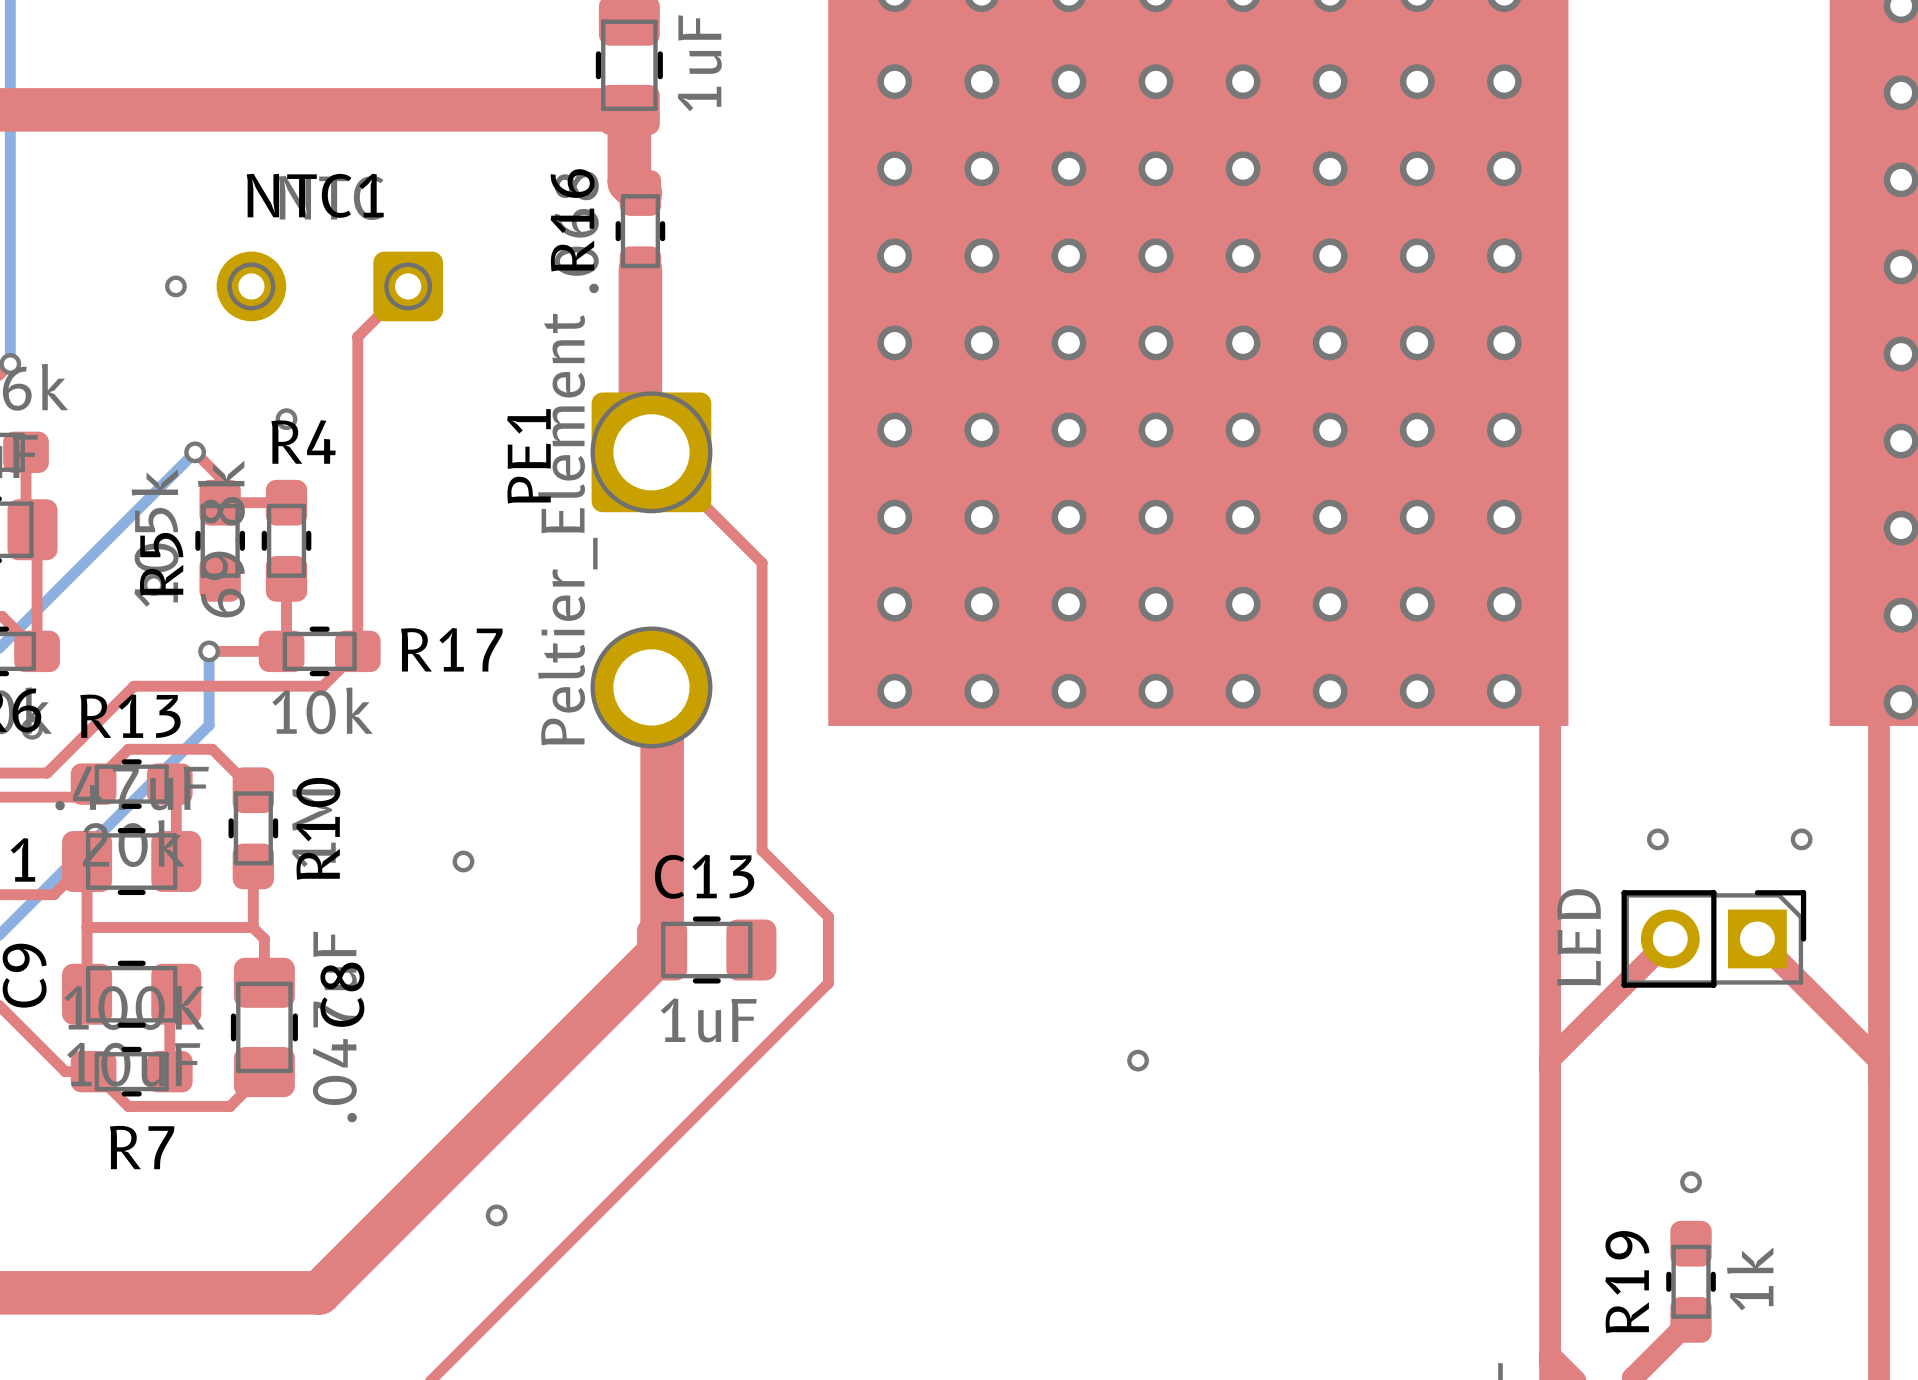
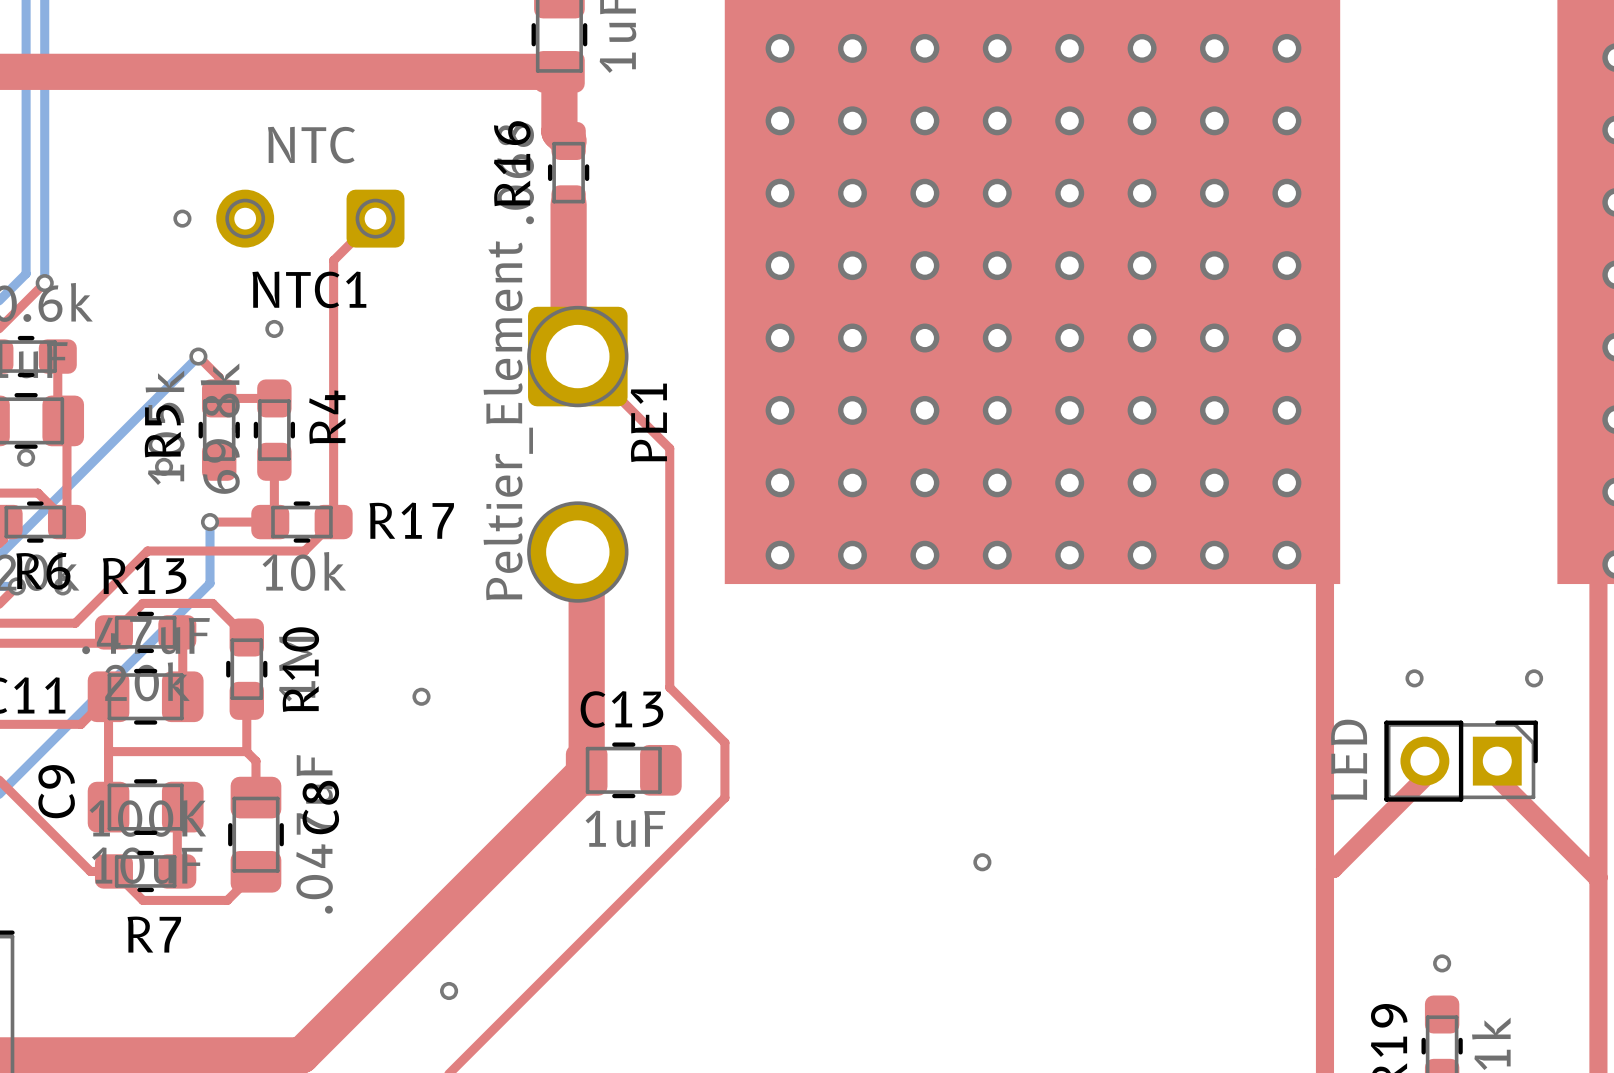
NTC1 name position: NTC1 (315, 195) -> NTC1 (309, 289)
R4 name rotation: 0° (303, 442) -> 90° counterclockwise (327, 417)
PE1 name position: PE1 (528, 456) -> PE1 (648, 422)
R5 name position: R5 (161, 564) -> R5 (162, 431)
top track: (1670, 938) (1550, 1059) -> none
top track: (1757, 938) (1879, 1060) -> none
top track: none -> (1424, 777) (1333, 869) (1324, 869)
top track: none -> (1497, 777) (1598, 877)

